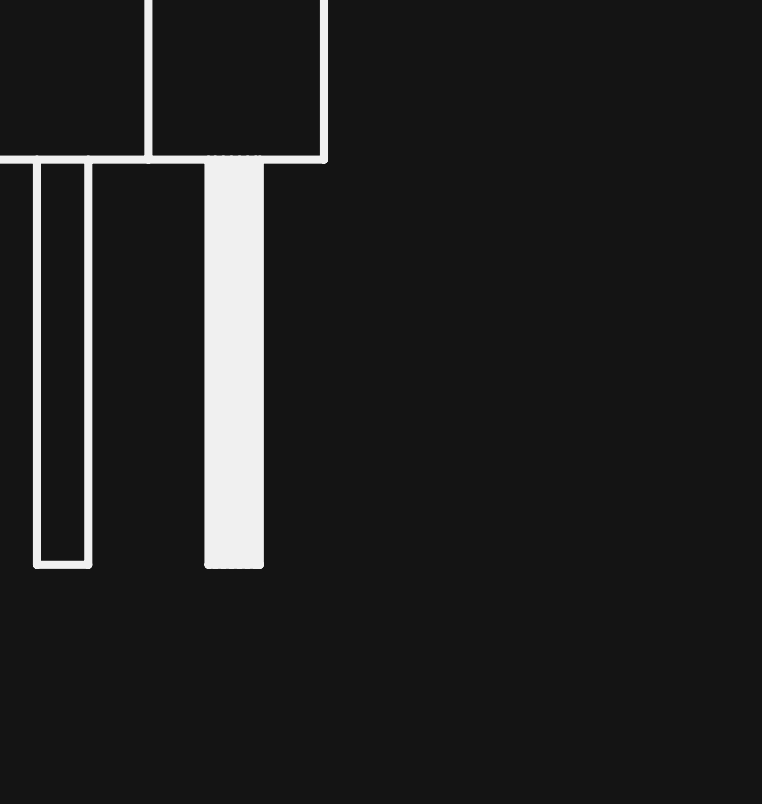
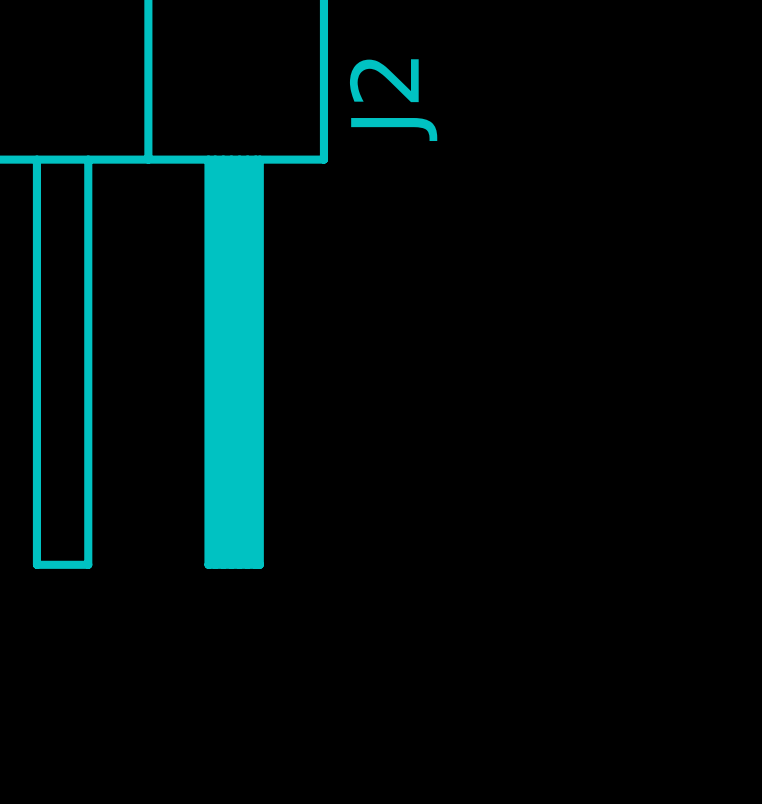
J2 name: none -> J2 (393, 100)

